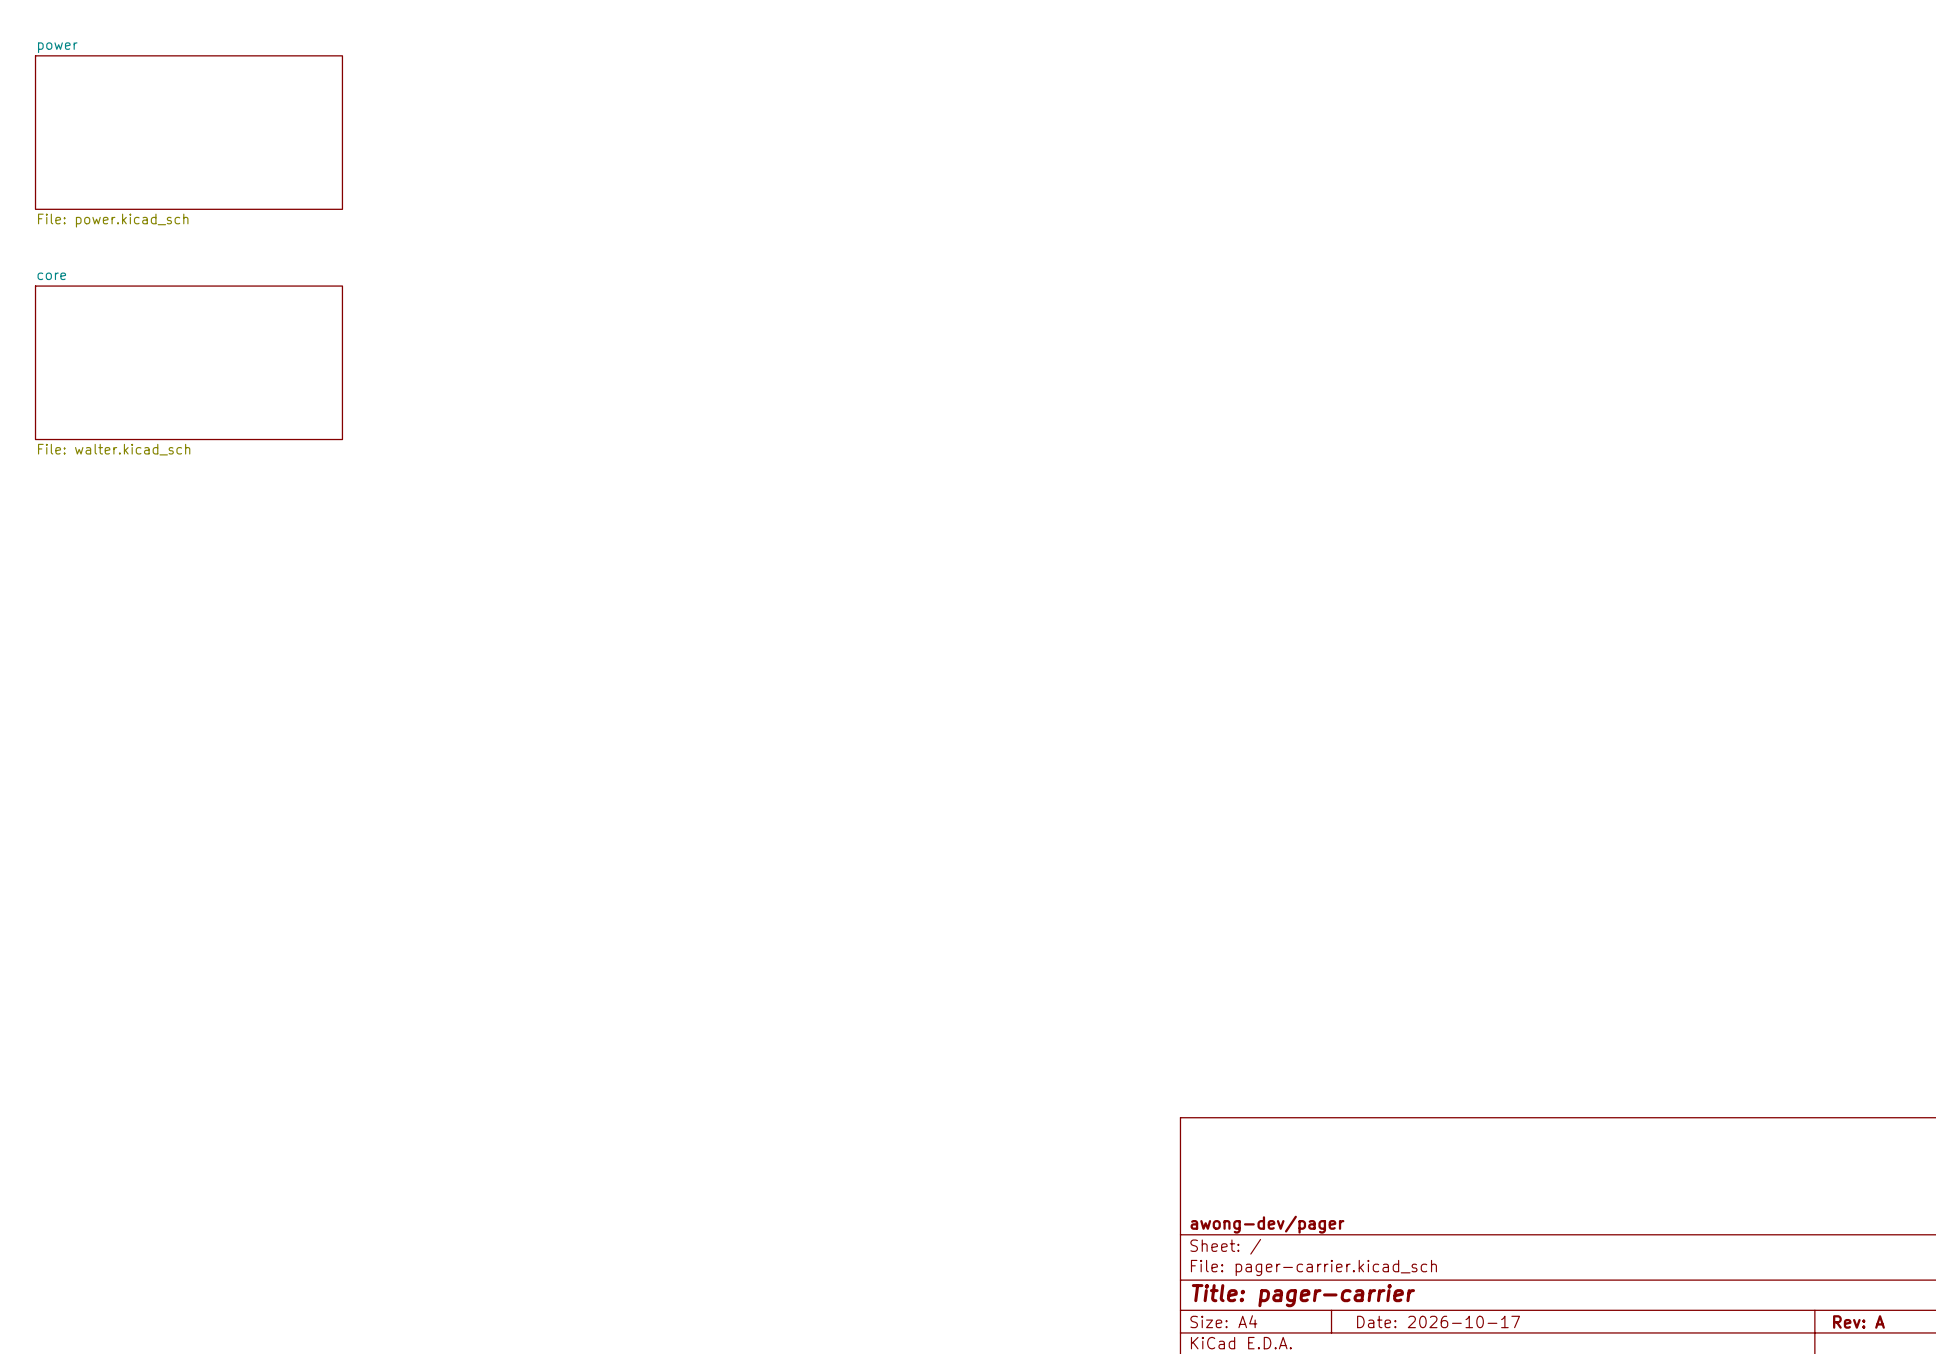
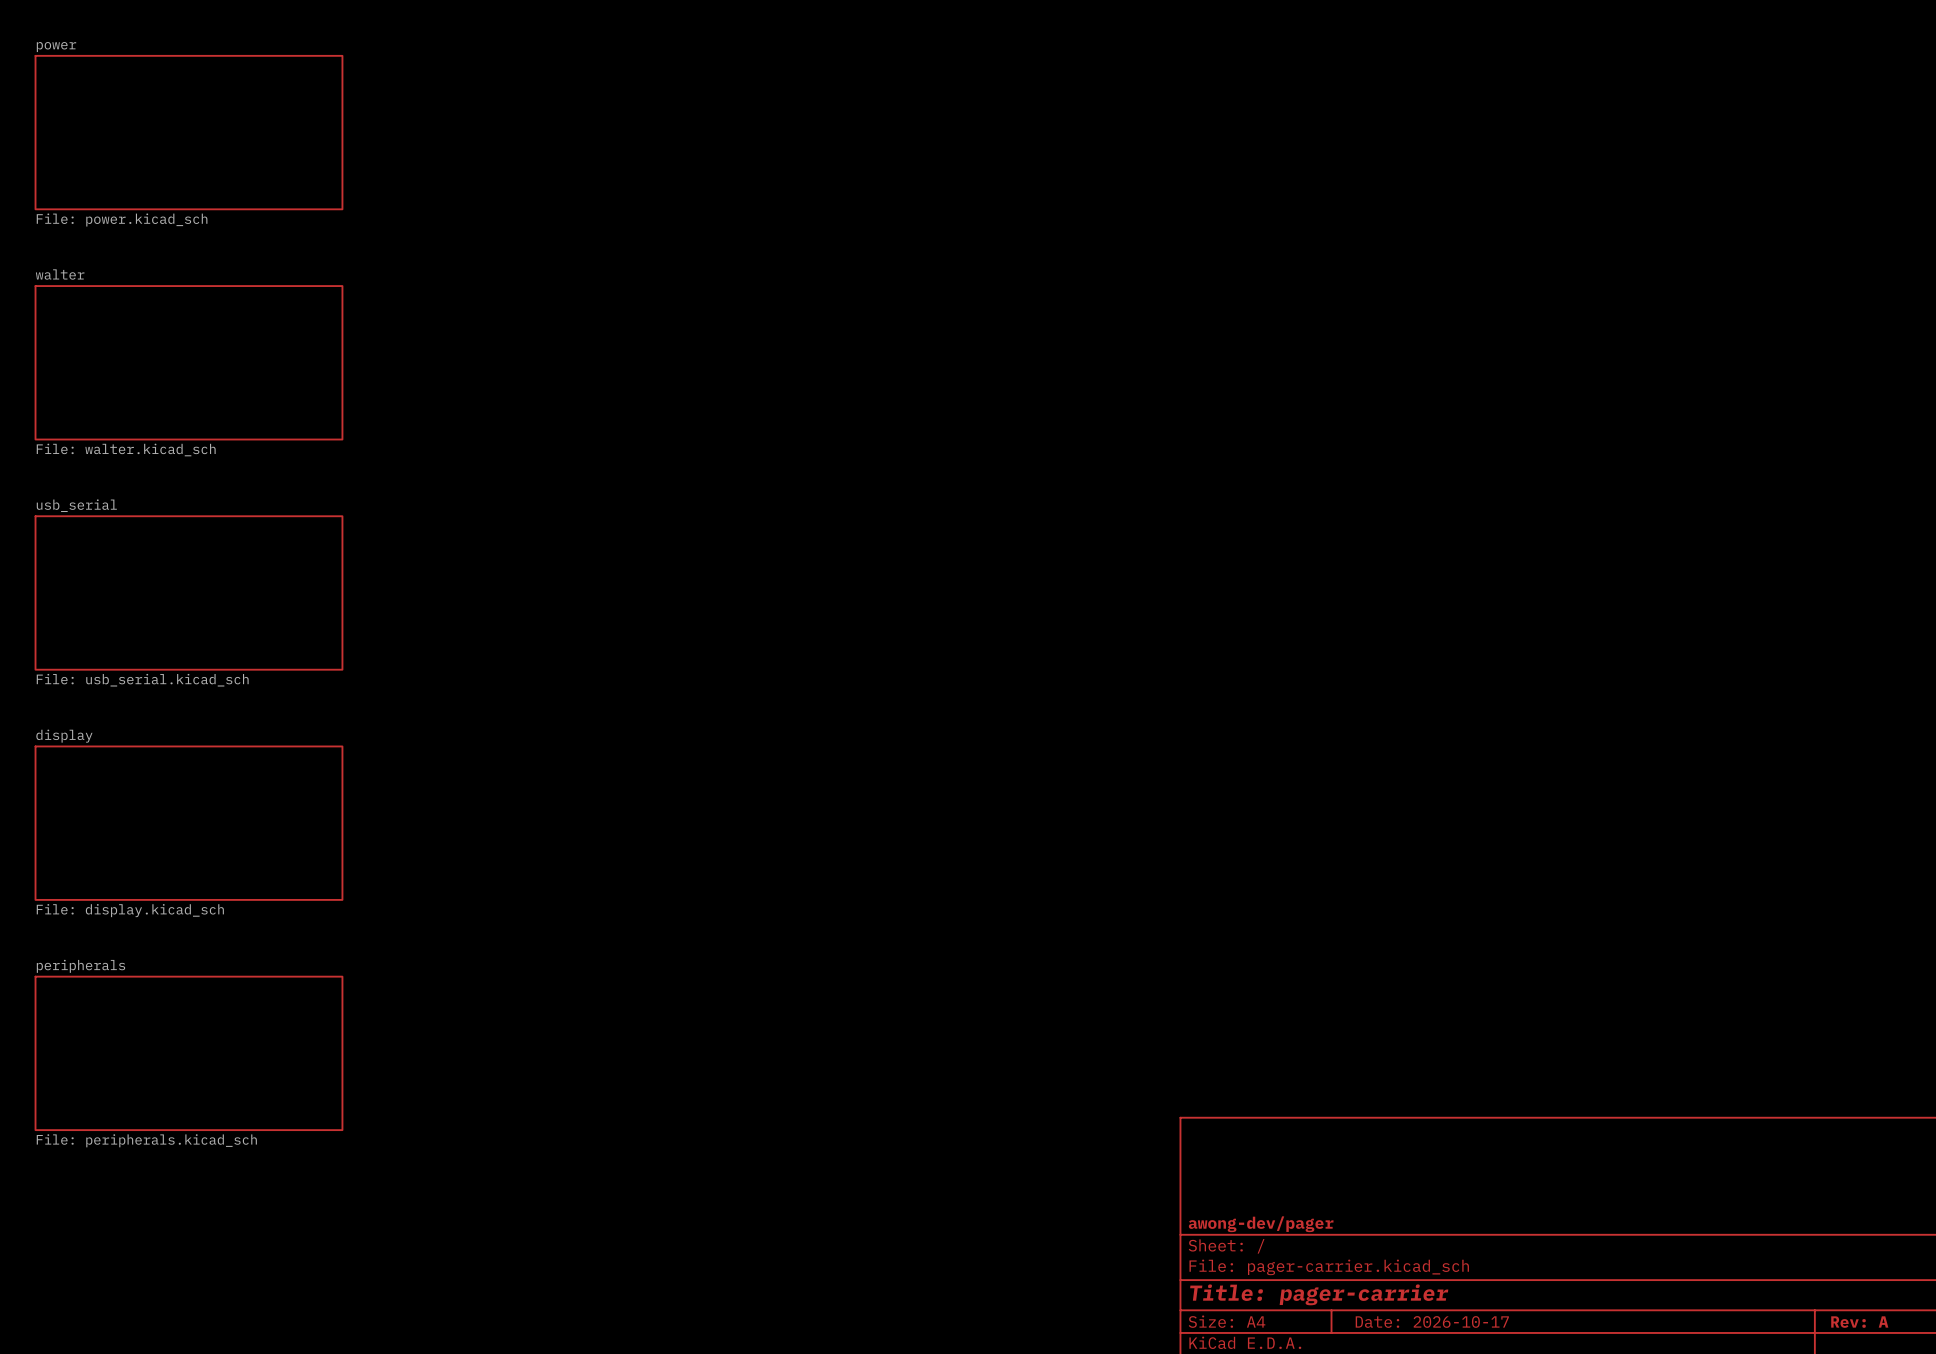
sheet core name: core (51, 276) -> walter (60, 274)
sheet usb_serial: none -> File: usb_serial.kicad_sch (188, 592)
sheet display: none -> File: display.kicad_sch (188, 823)
sheet peripherals: none -> File: peripherals.kicad_sch (188, 1053)

